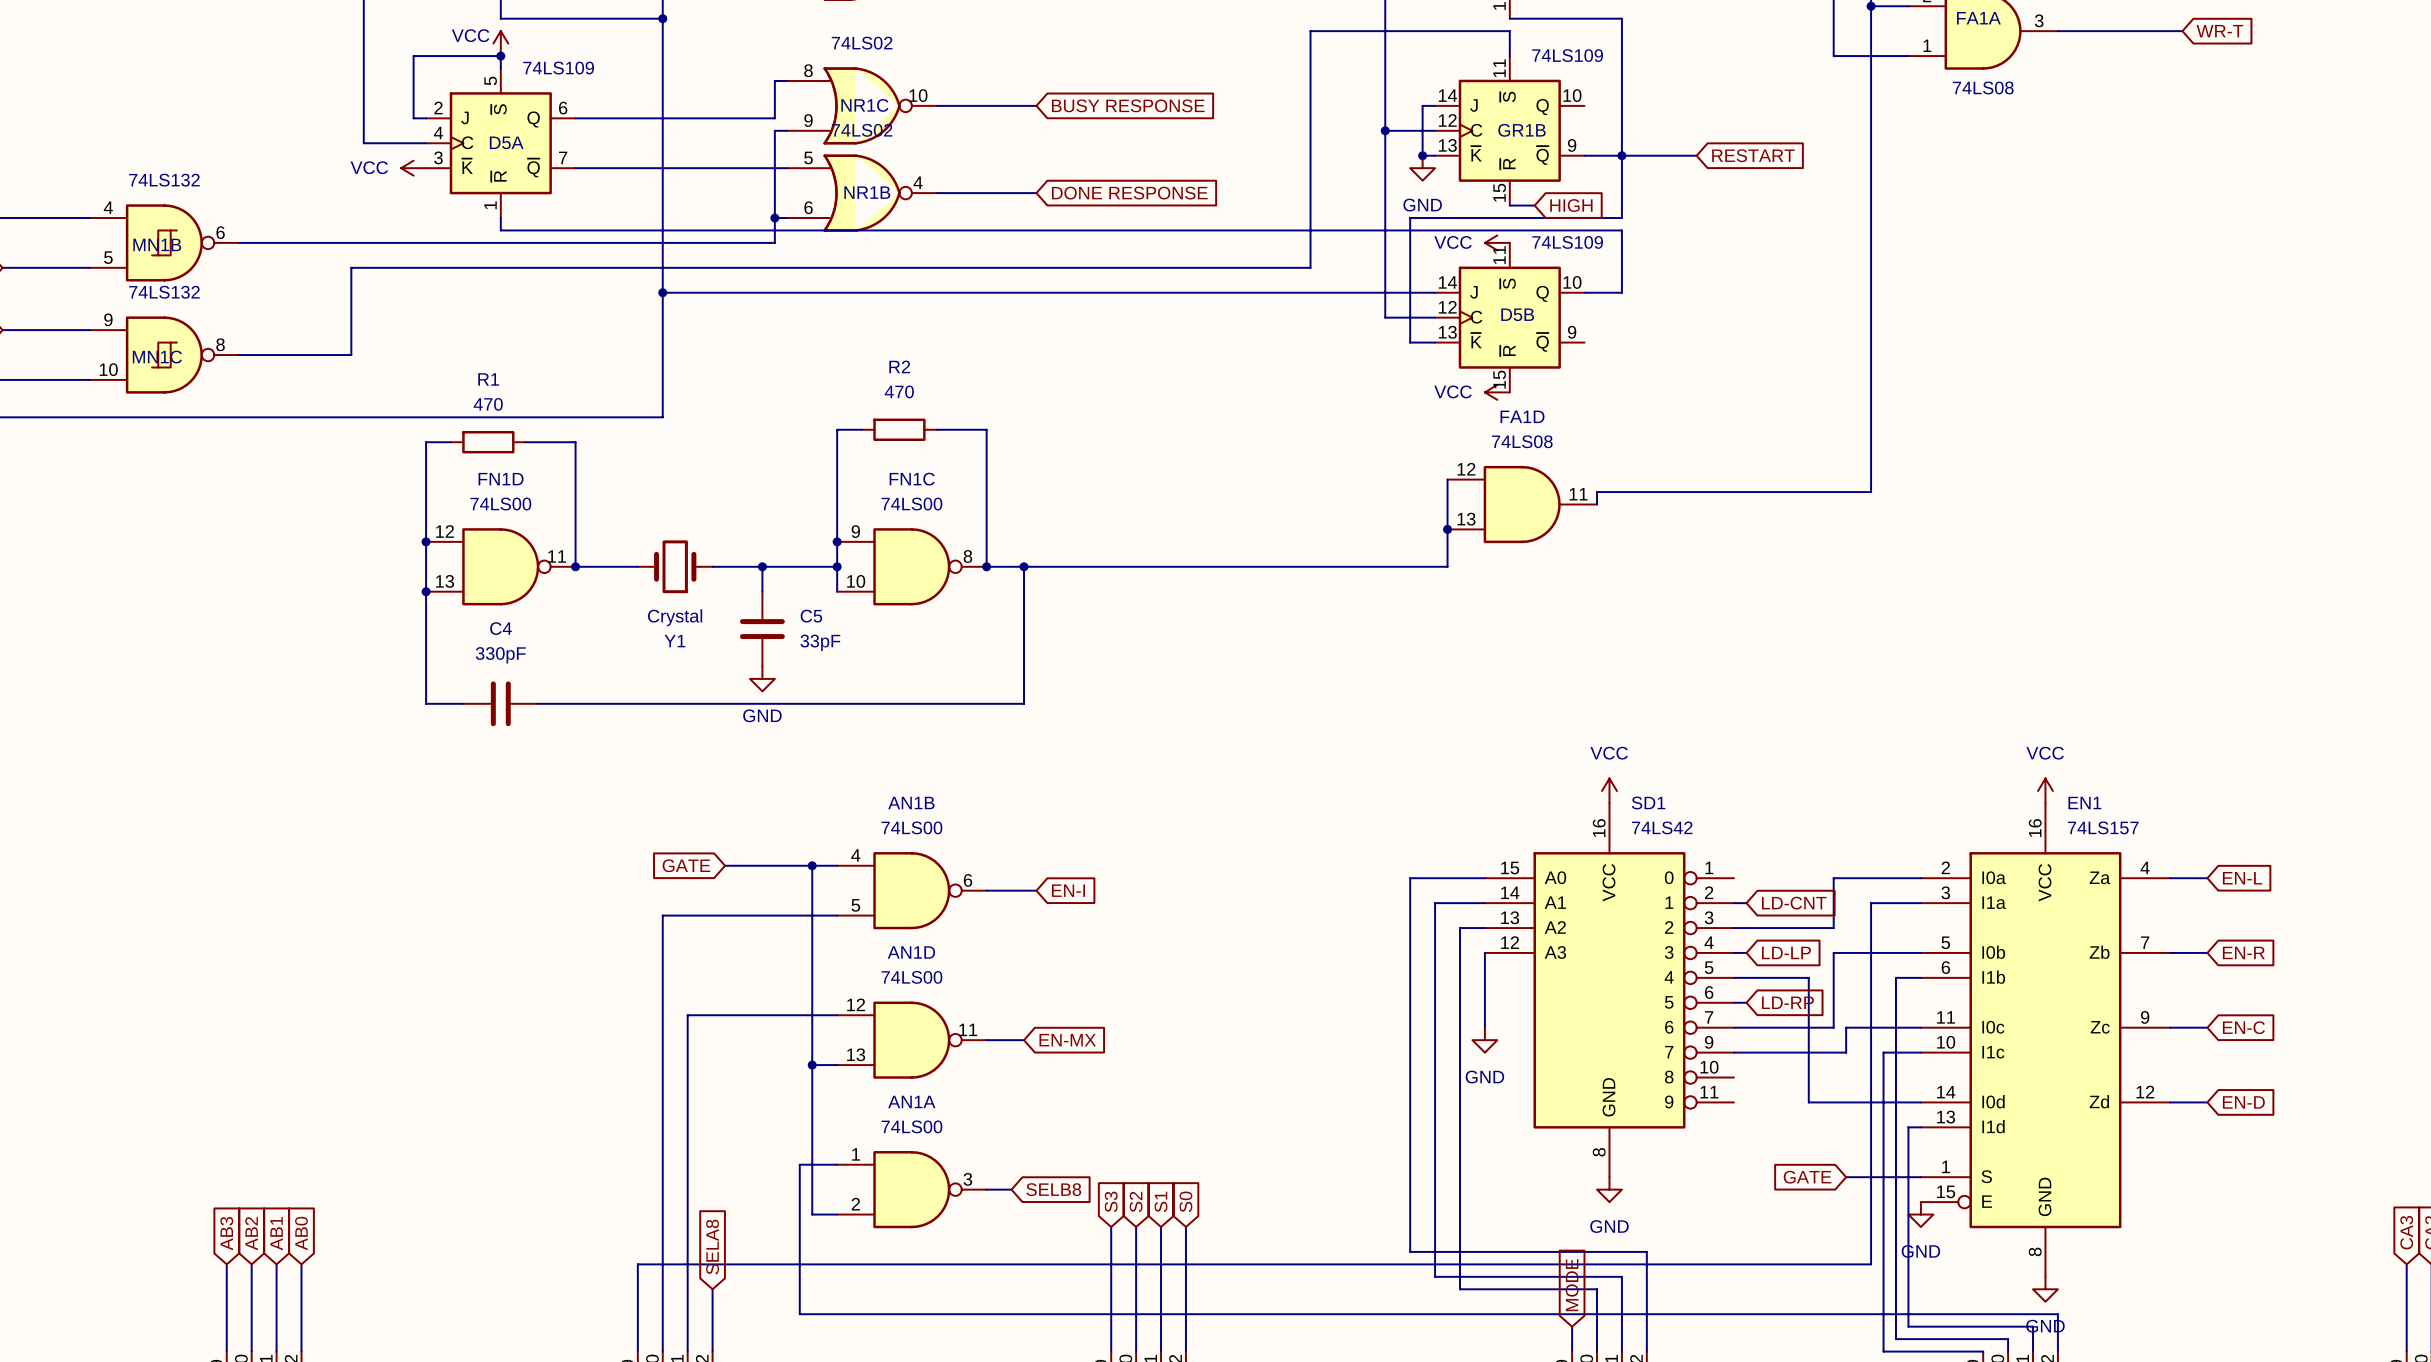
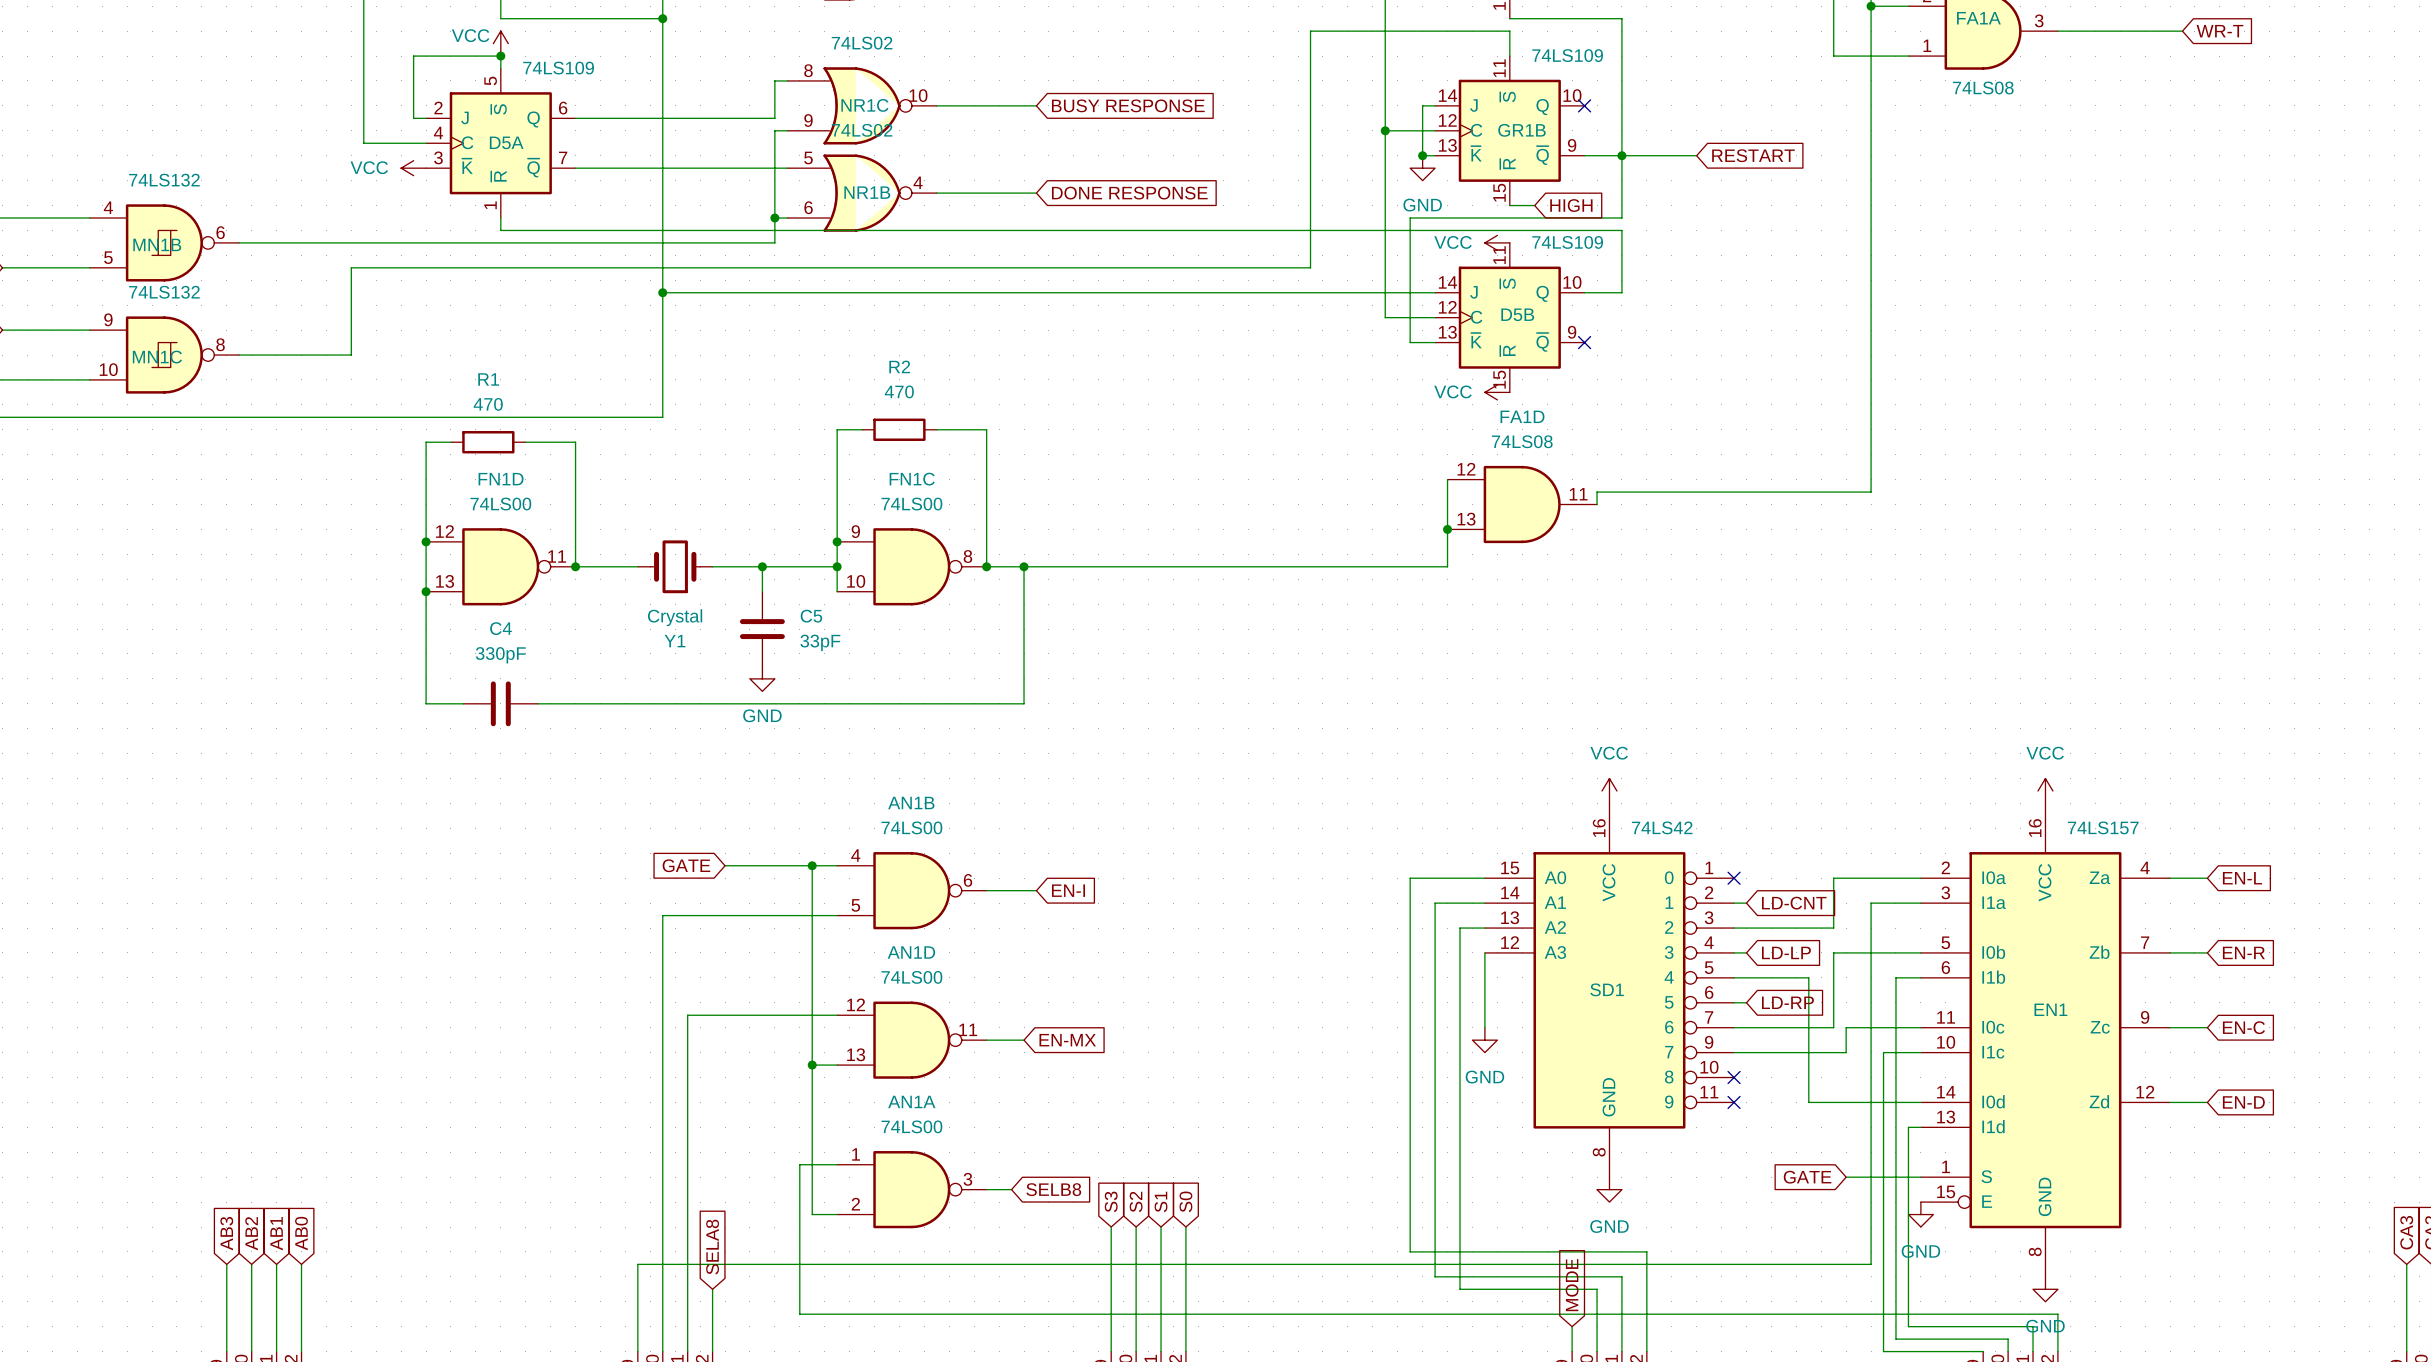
no-connect mark: none -> (1584, 105)
no-connect mark: none -> (1584, 342)
SD1 name position: SD1 (1648, 803) -> SD1 (1607, 989)
EN1 name position: EN1 (2084, 803) -> EN1 (2050, 1009)
no-connect mark: none -> (1734, 878)
no-connect mark: none -> (1734, 1077)
no-connect mark: none -> (1734, 1102)

